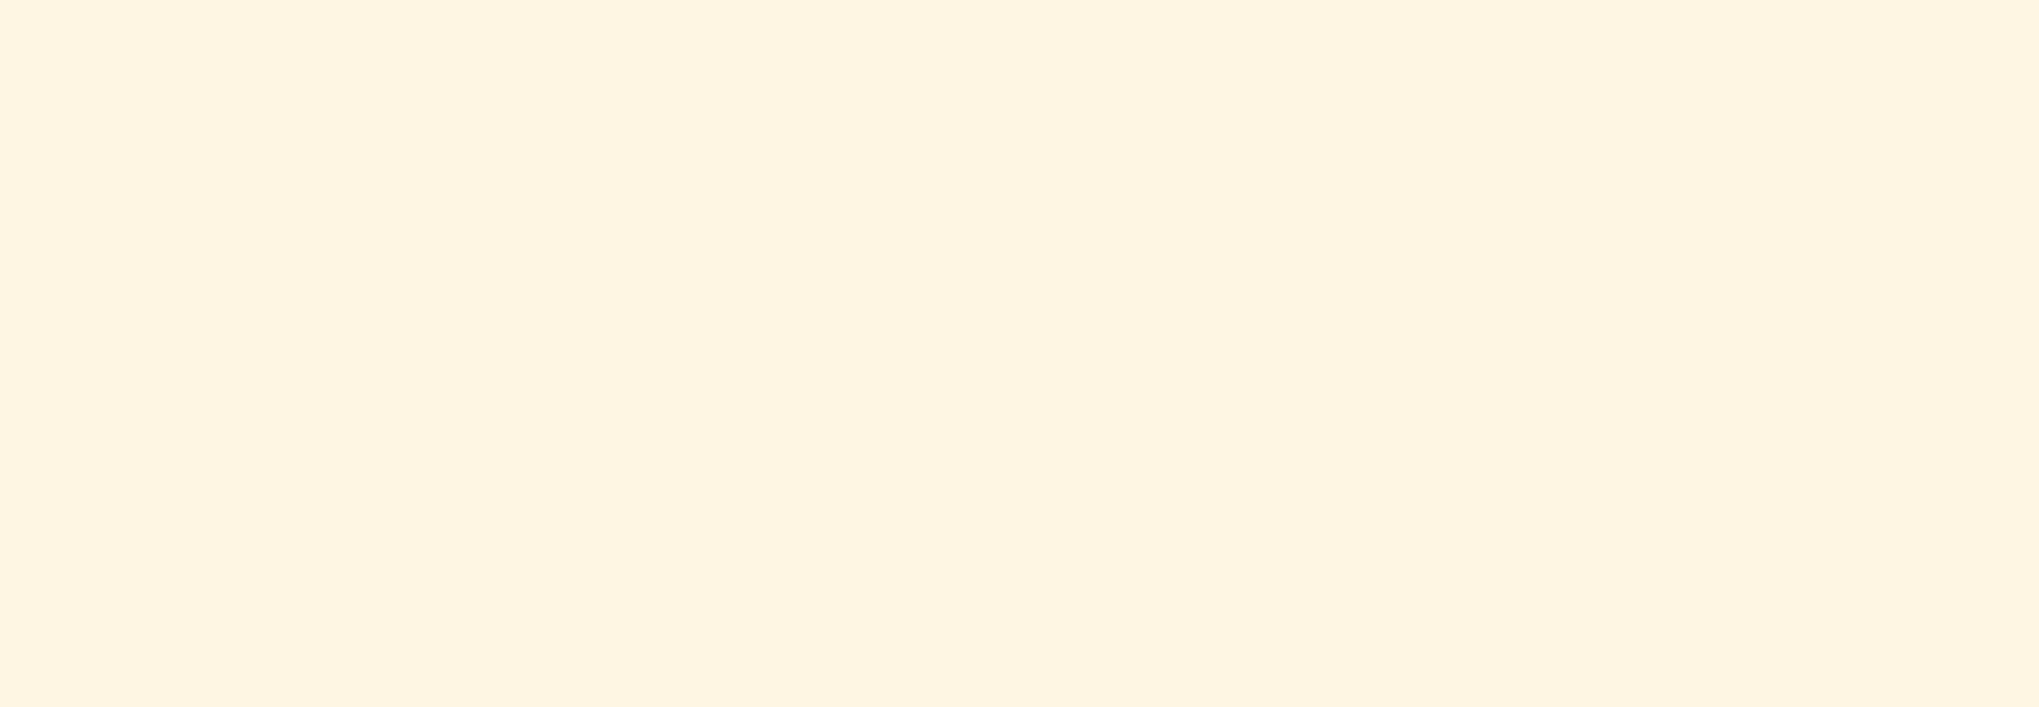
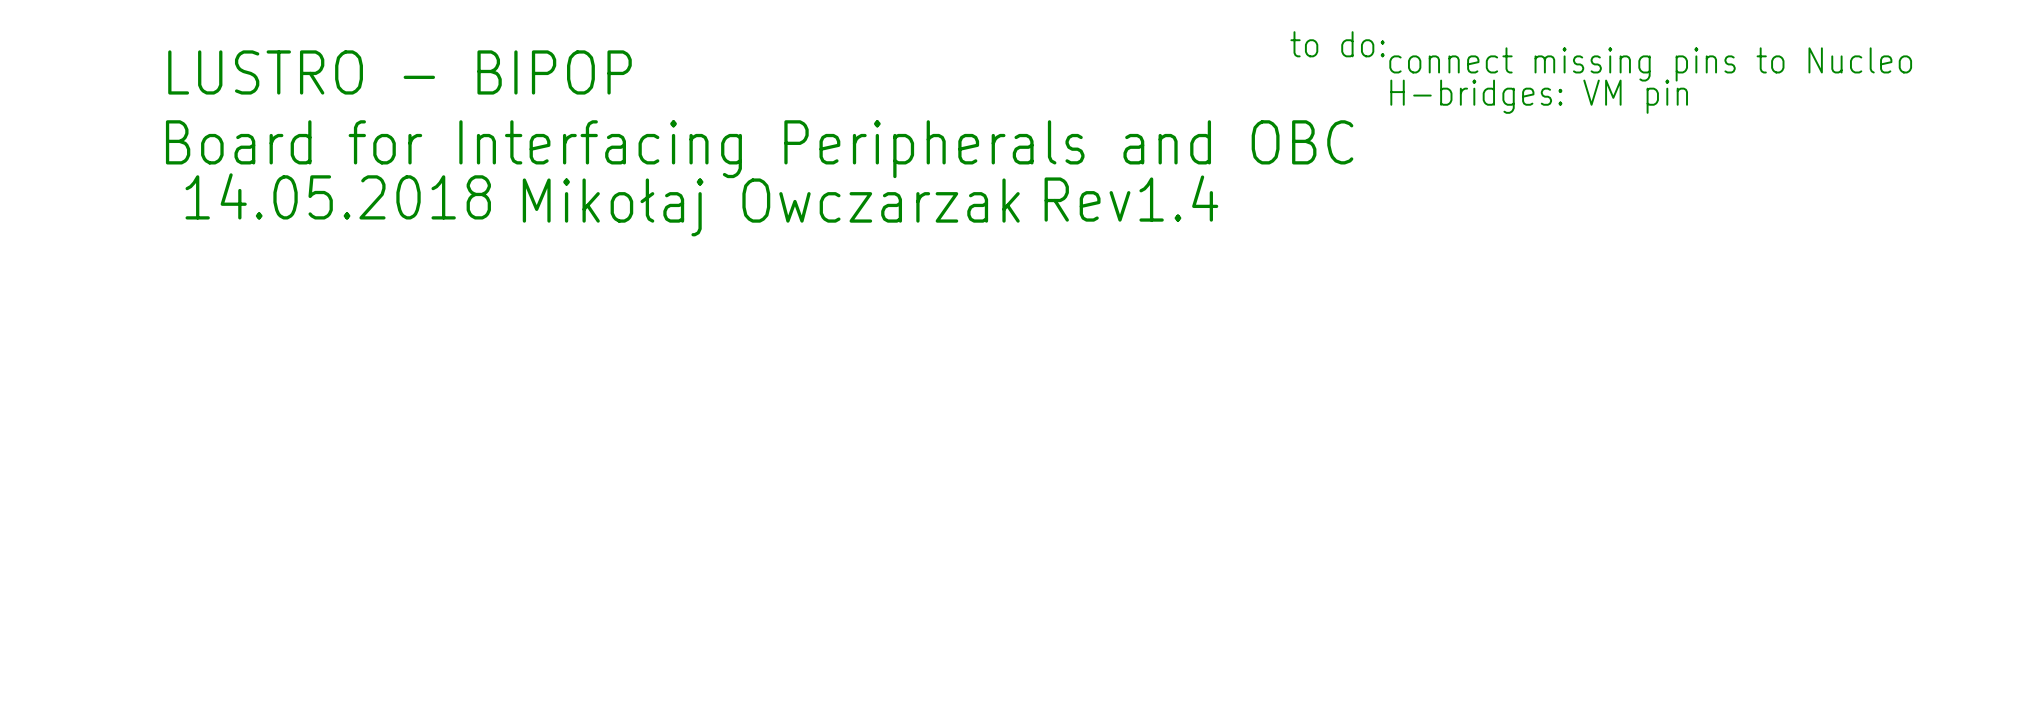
text: none -> to do: (1337, 44)
text: none -> connect missing pins to Nucleo (1650, 64)
text: none -> LUSTRO - BIPOP (399, 72)
text: none -> H-bridges: VM pin (1539, 96)
text: none -> Board for Interfacing Peripherals and OBC (759, 149)
text: none -> 14.05.2018 (338, 196)
text: none -> Rev1.4 (1131, 198)
text: none -> Mikołaj Owczarzak (771, 207)

